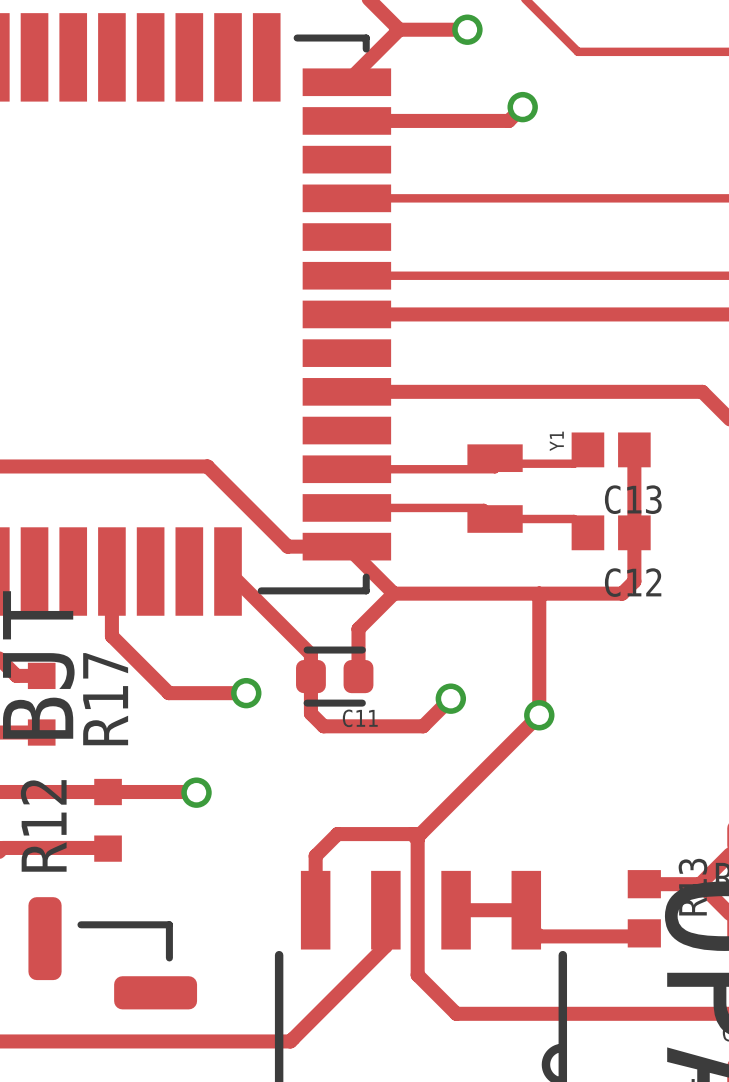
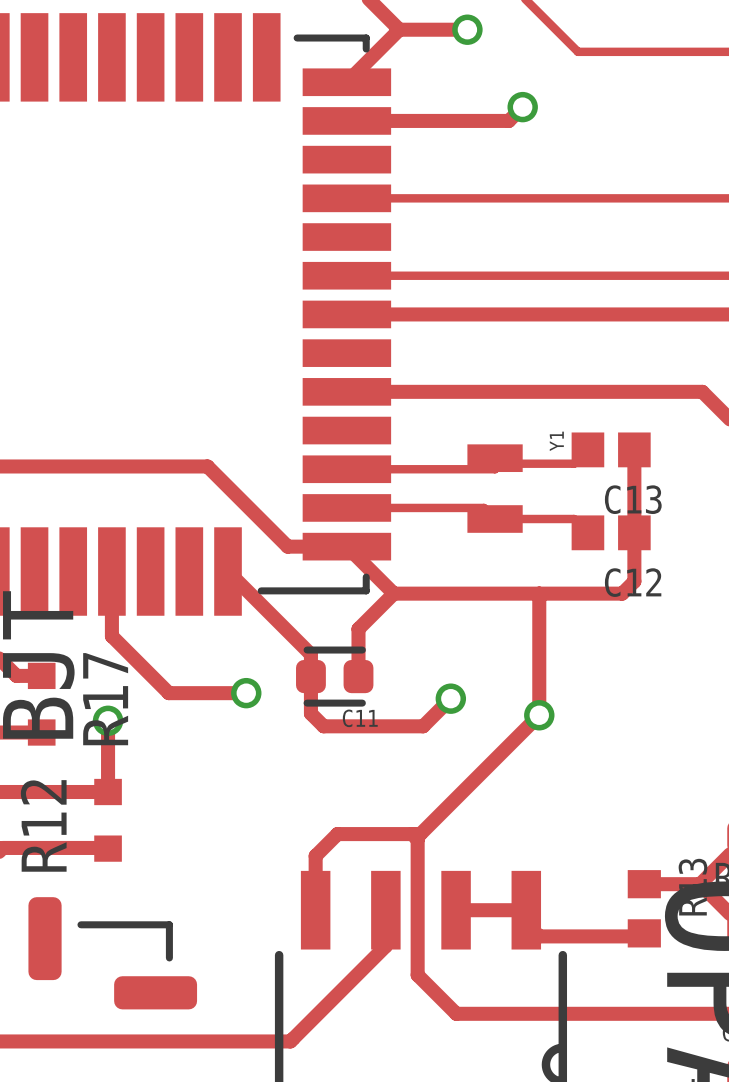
track: (108, 792) (195, 792) -> (108, 792) (108, 720)
via position: (196, 792) -> (108, 720)

